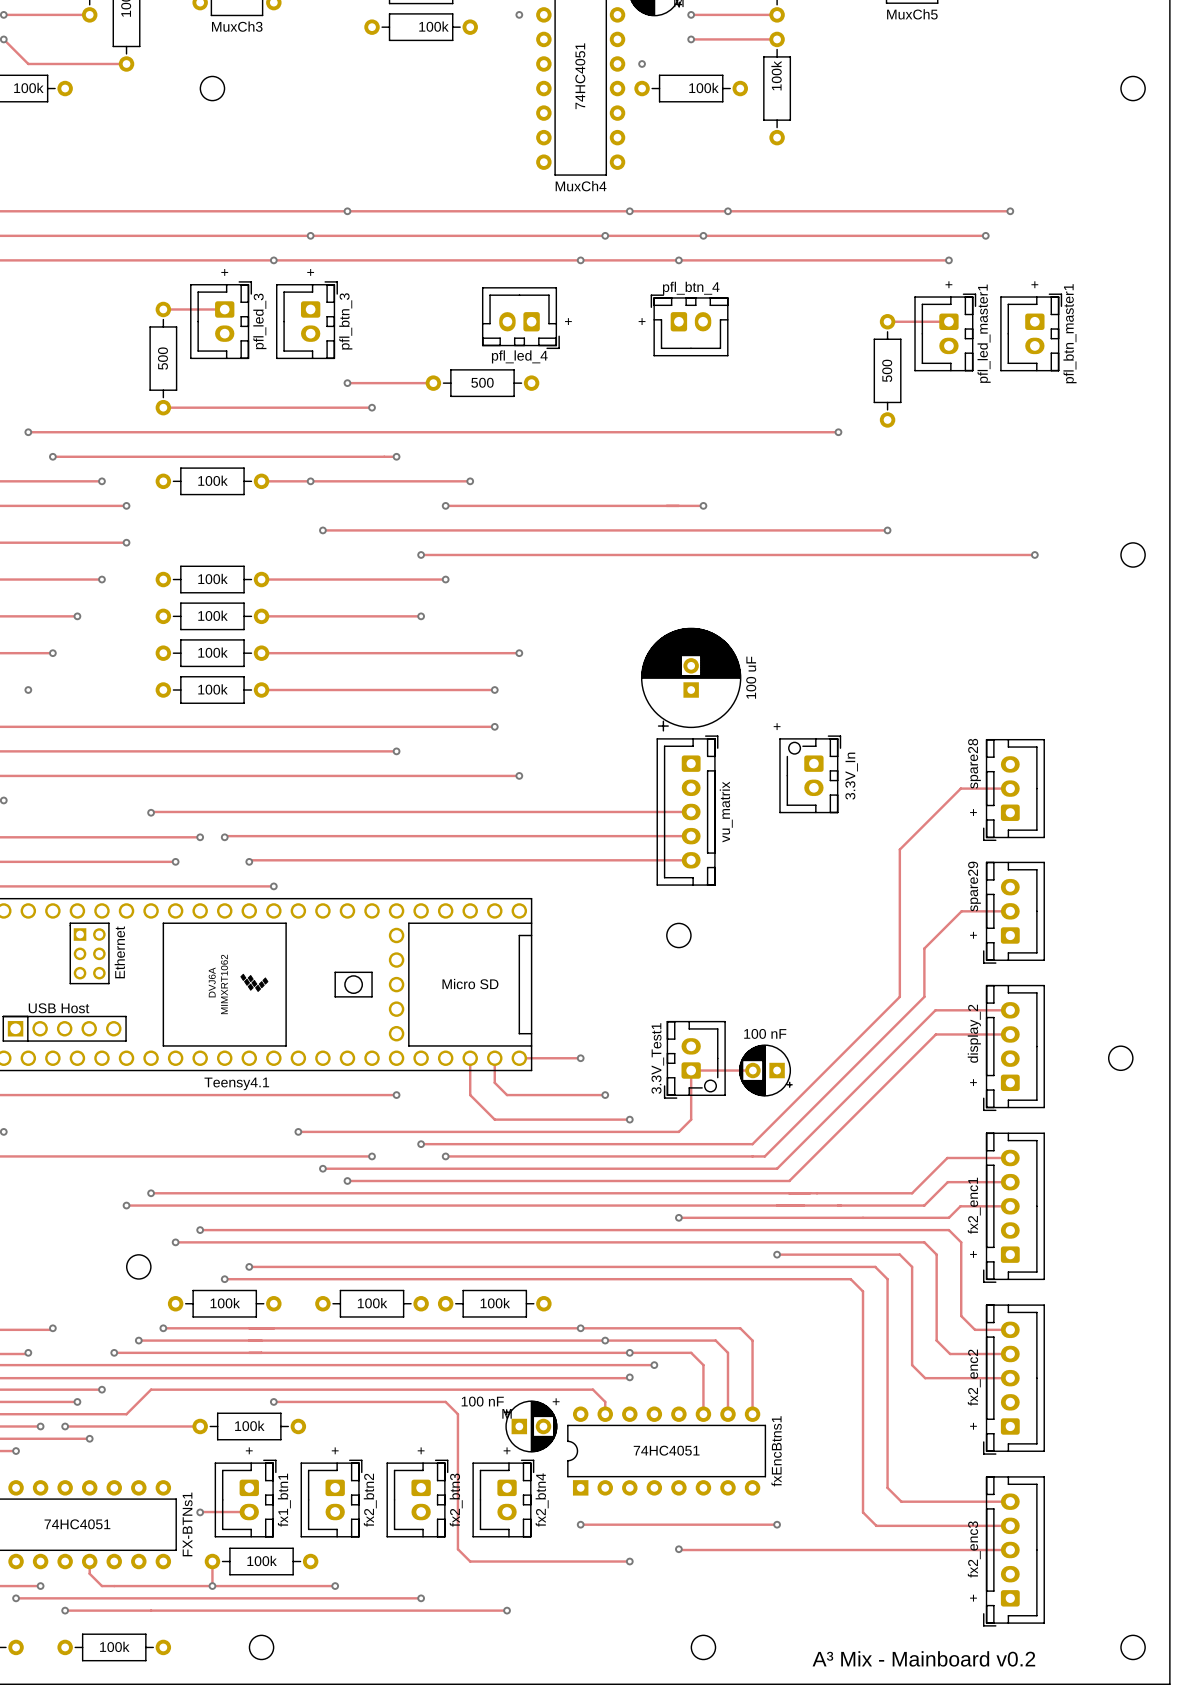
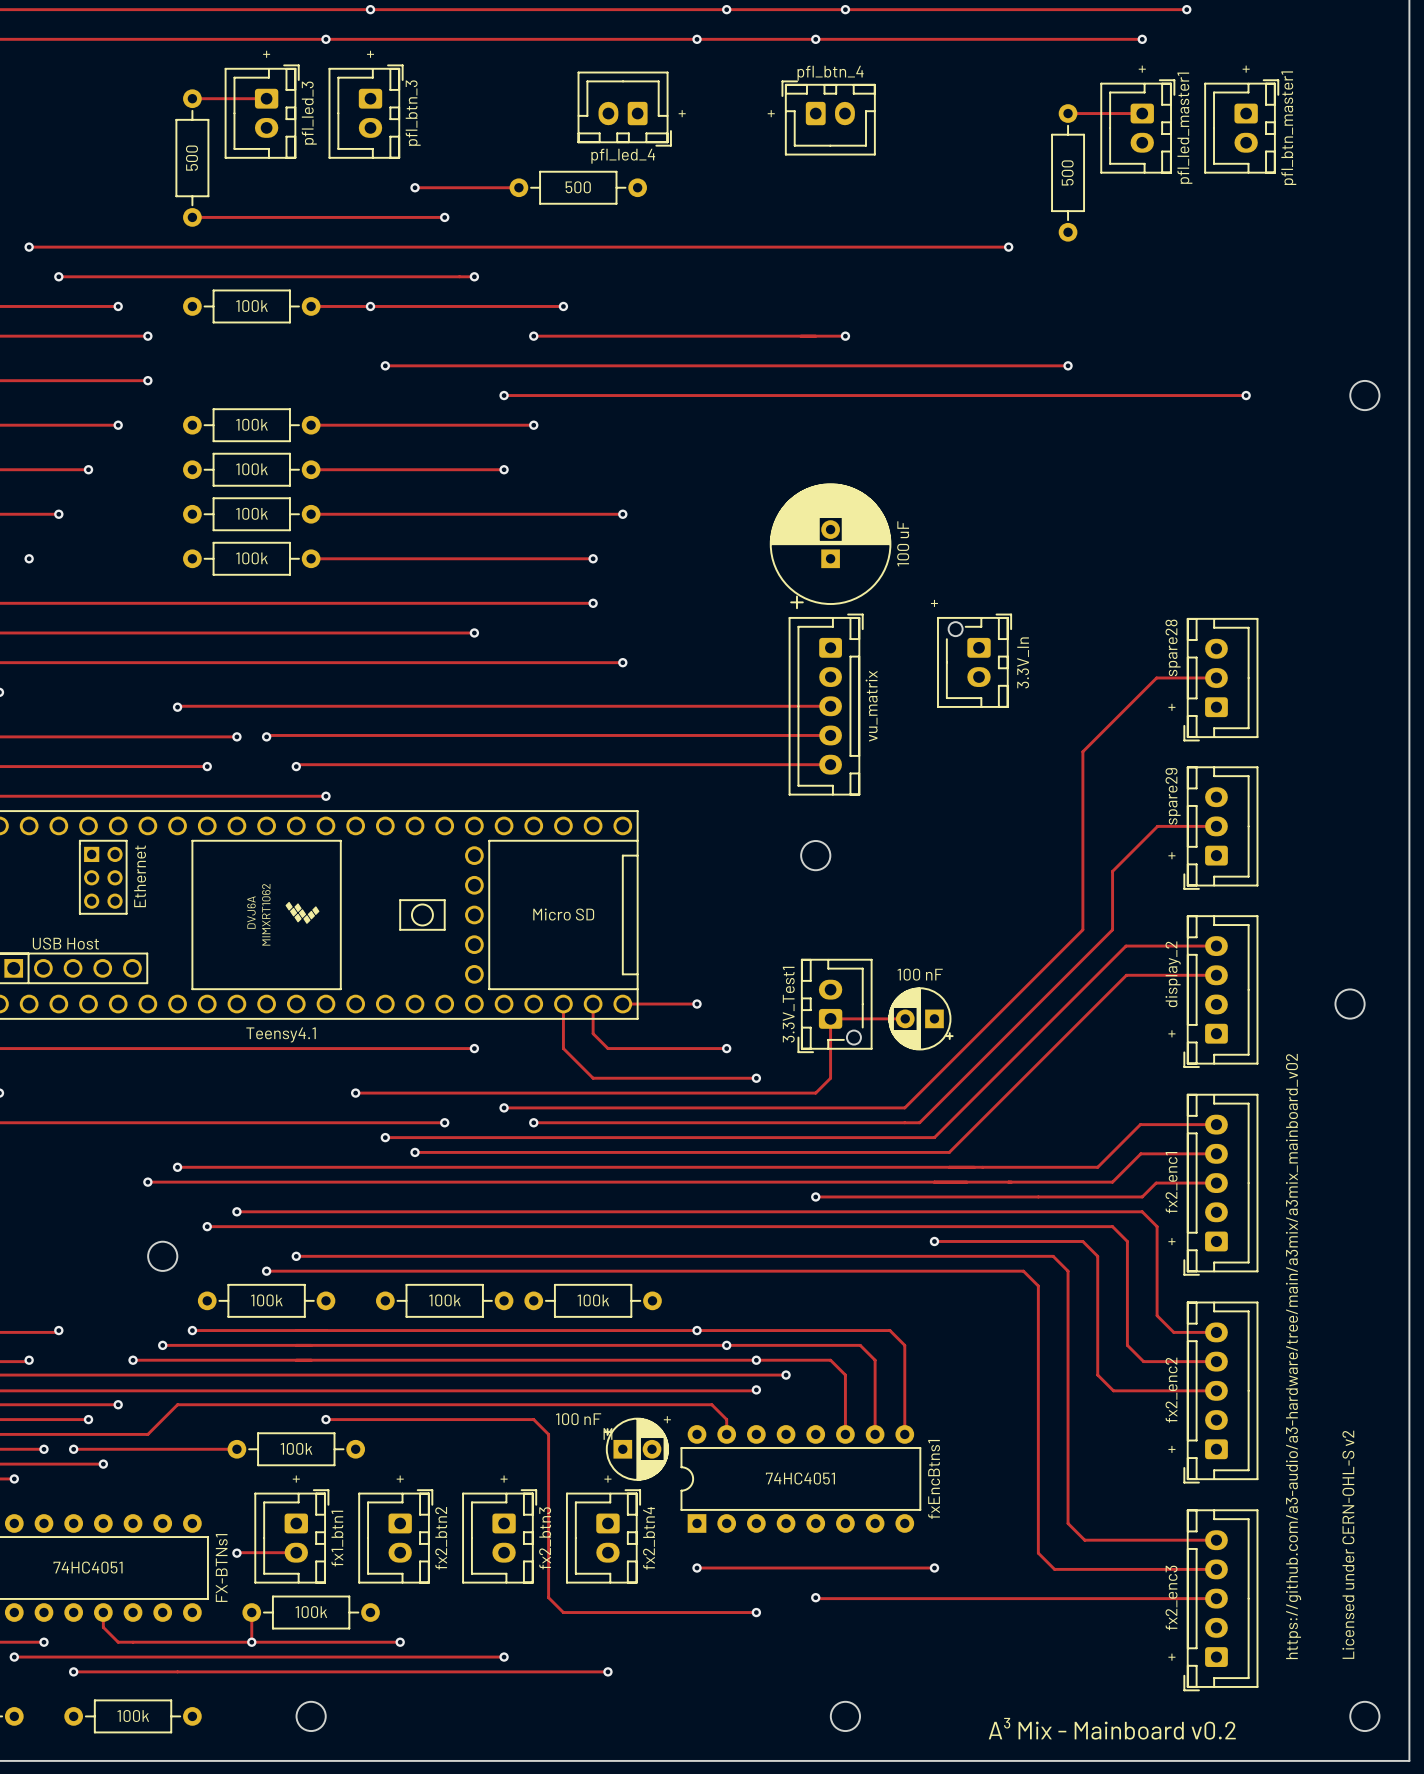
text: none -> https://github.com/a3-audio/a3-hardware/tree/main/a3mix/a3mix_mainboard_v02 (1293, 1356)
text: none -> Licensed under CERN-OHL-S v2 (1348, 1544)

